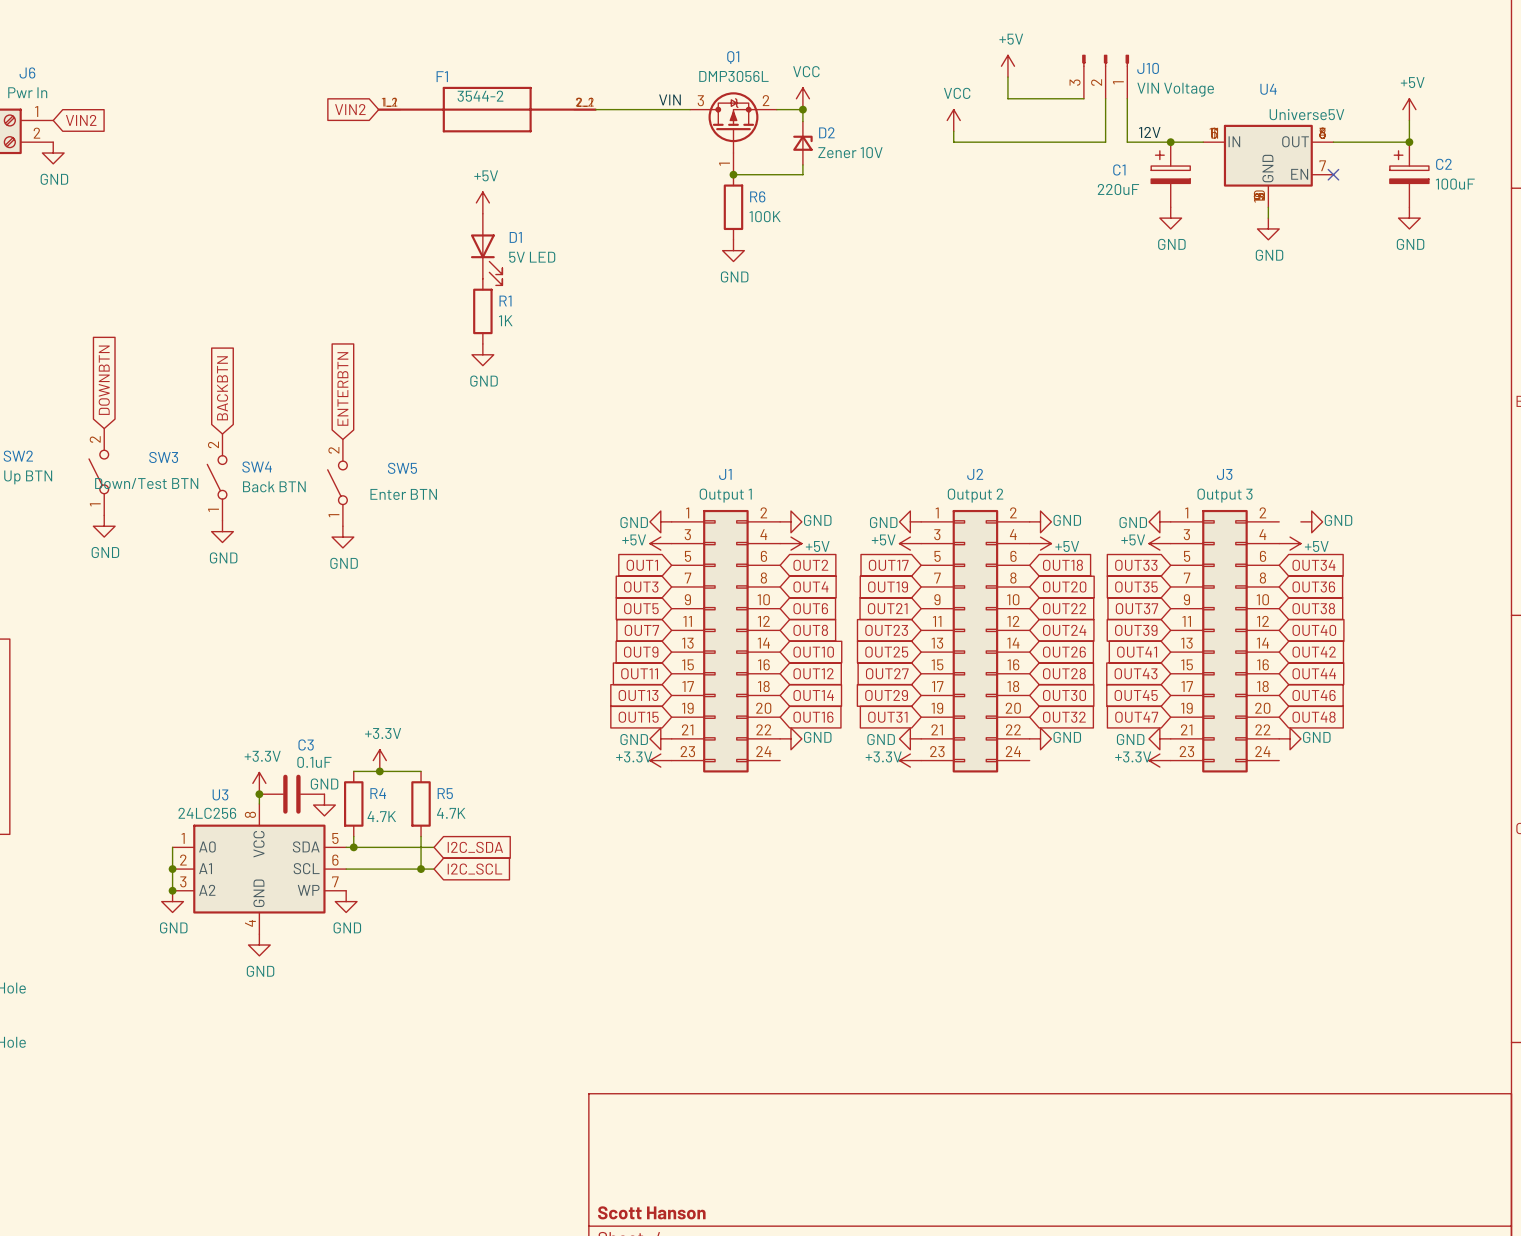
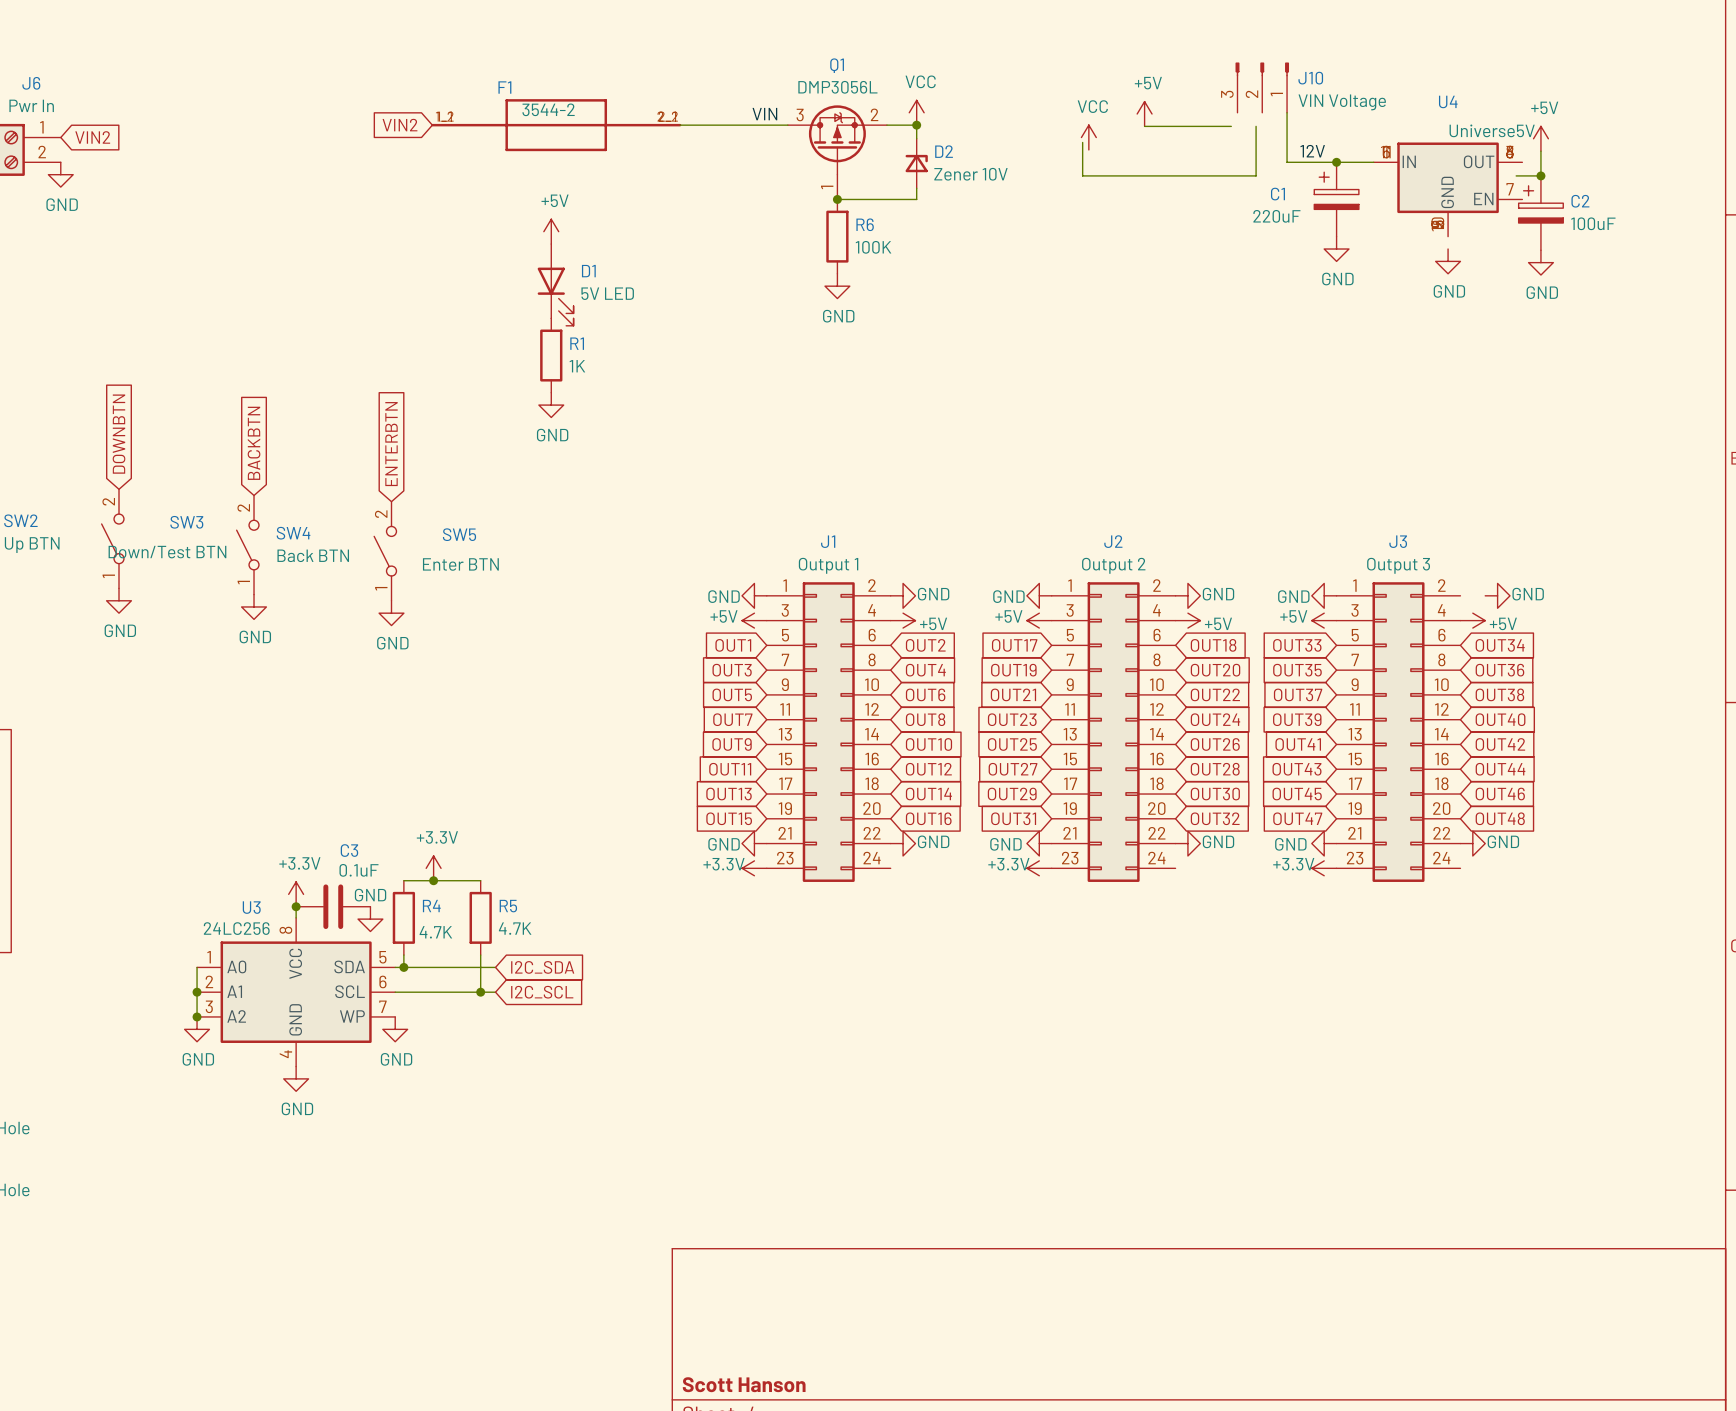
power symbol position: +5V (1007, 66) -> +5V (1144, 114)
wire: (1007, 77) (1007, 98) (1083, 98) -> none
wire: (1105, 98) (1105, 142) (953, 142) (953, 131) -> none
power symbol position: +5V (1409, 109) -> +5V (1540, 138)
wire: none -> (1144, 126) (1231, 126)
wire: none -> (1256, 126) (1256, 175) (1082, 175) (1082, 142)
wire: (1409, 120) (1409, 142) (1333, 142) -> none
wire: none -> (1540, 151) (1540, 175) (1516, 175)
junction: (1409, 142) -> none
junction: none -> (1540, 175)
no-connect mark: (1333, 174) -> none
C2 position: (1409, 174) -> (1540, 213)
wire: (1268, 207) (1268, 218) -> none
power symbol position: GND (1409, 218) -> GND (1540, 262)

